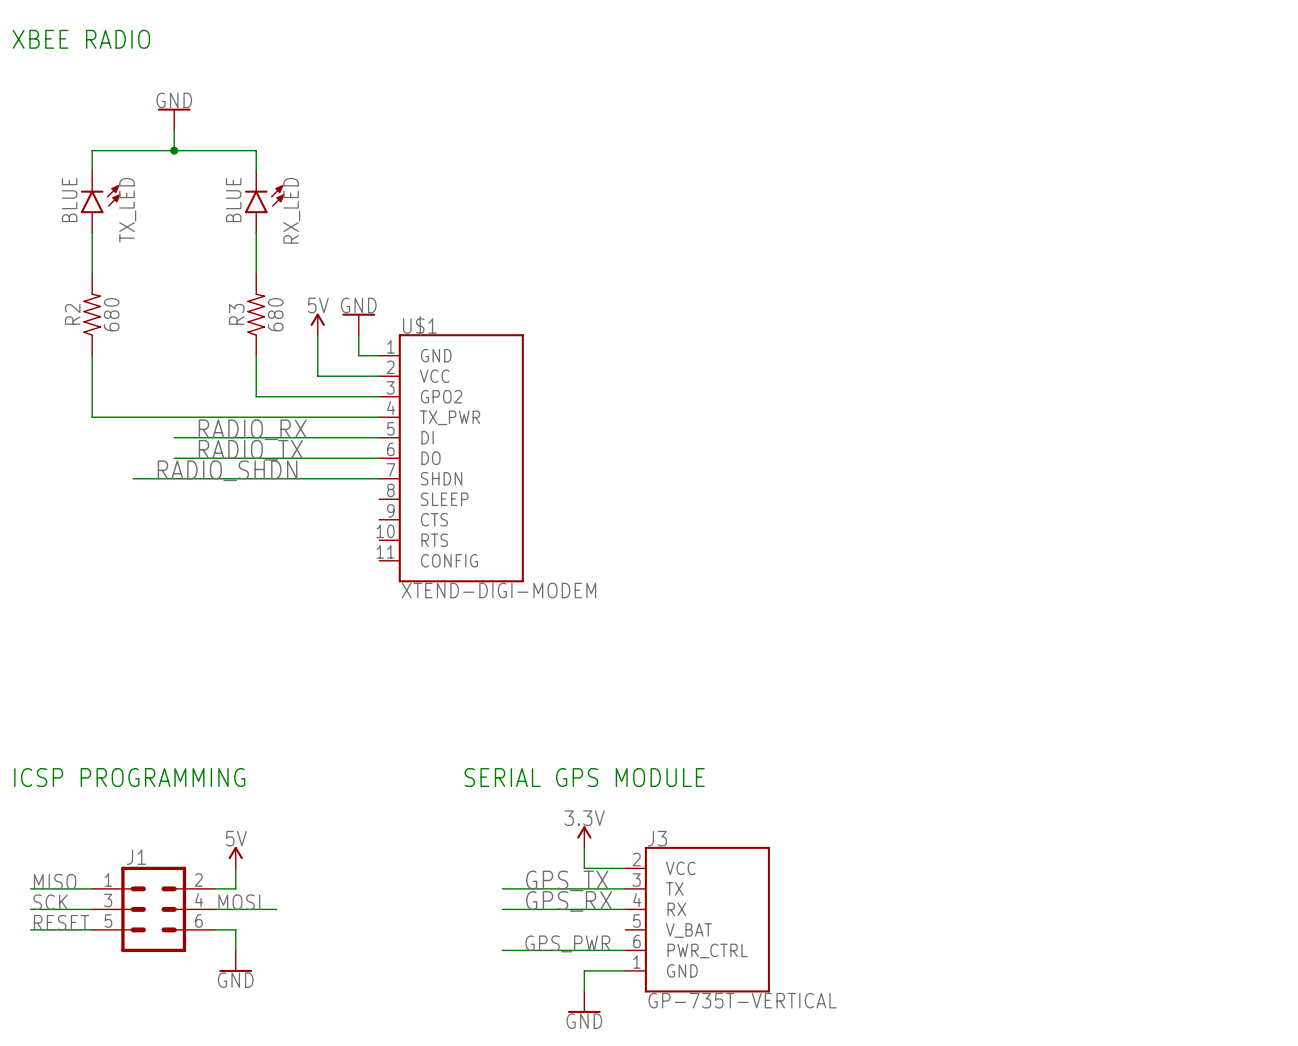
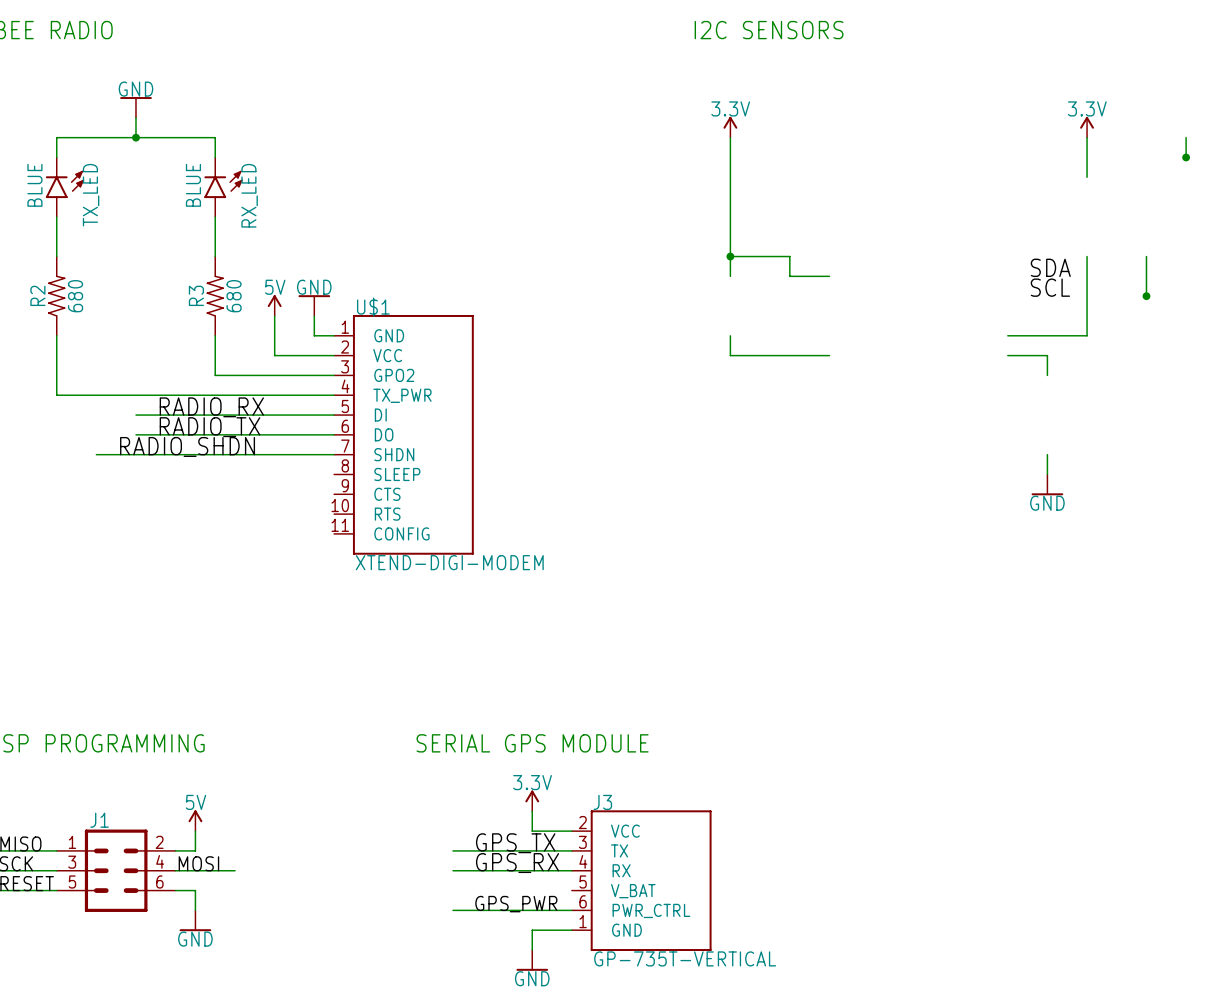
text: none -> I2C SENSORS (769, 30)
power symbol: none -> 3.3V (730, 127)
power symbol: none -> 3.3V (1087, 127)
wire: none -> (730, 137) (730, 276)
wire: none -> (1087, 137) (1087, 177)
wire: none -> (1186, 137) (1186, 157)
junction: none -> (1186, 157)
wire: none -> (730, 256) (789, 256) (789, 276) (829, 276)
junction: none -> (730, 256)
wire: none -> (1087, 256) (1087, 335) (1007, 335)
wire: none -> (1146, 256) (1146, 296)
label: none -> SDA (1050, 267)
label: none -> SCL (1050, 287)
junction: none -> (1146, 296)
wire: none -> (730, 335) (730, 355) (829, 355)
wire: none -> (1007, 355) (1047, 355) (1047, 375)
wire: none -> (1047, 454) (1047, 474)
power symbol: none -> GND (1047, 484)

